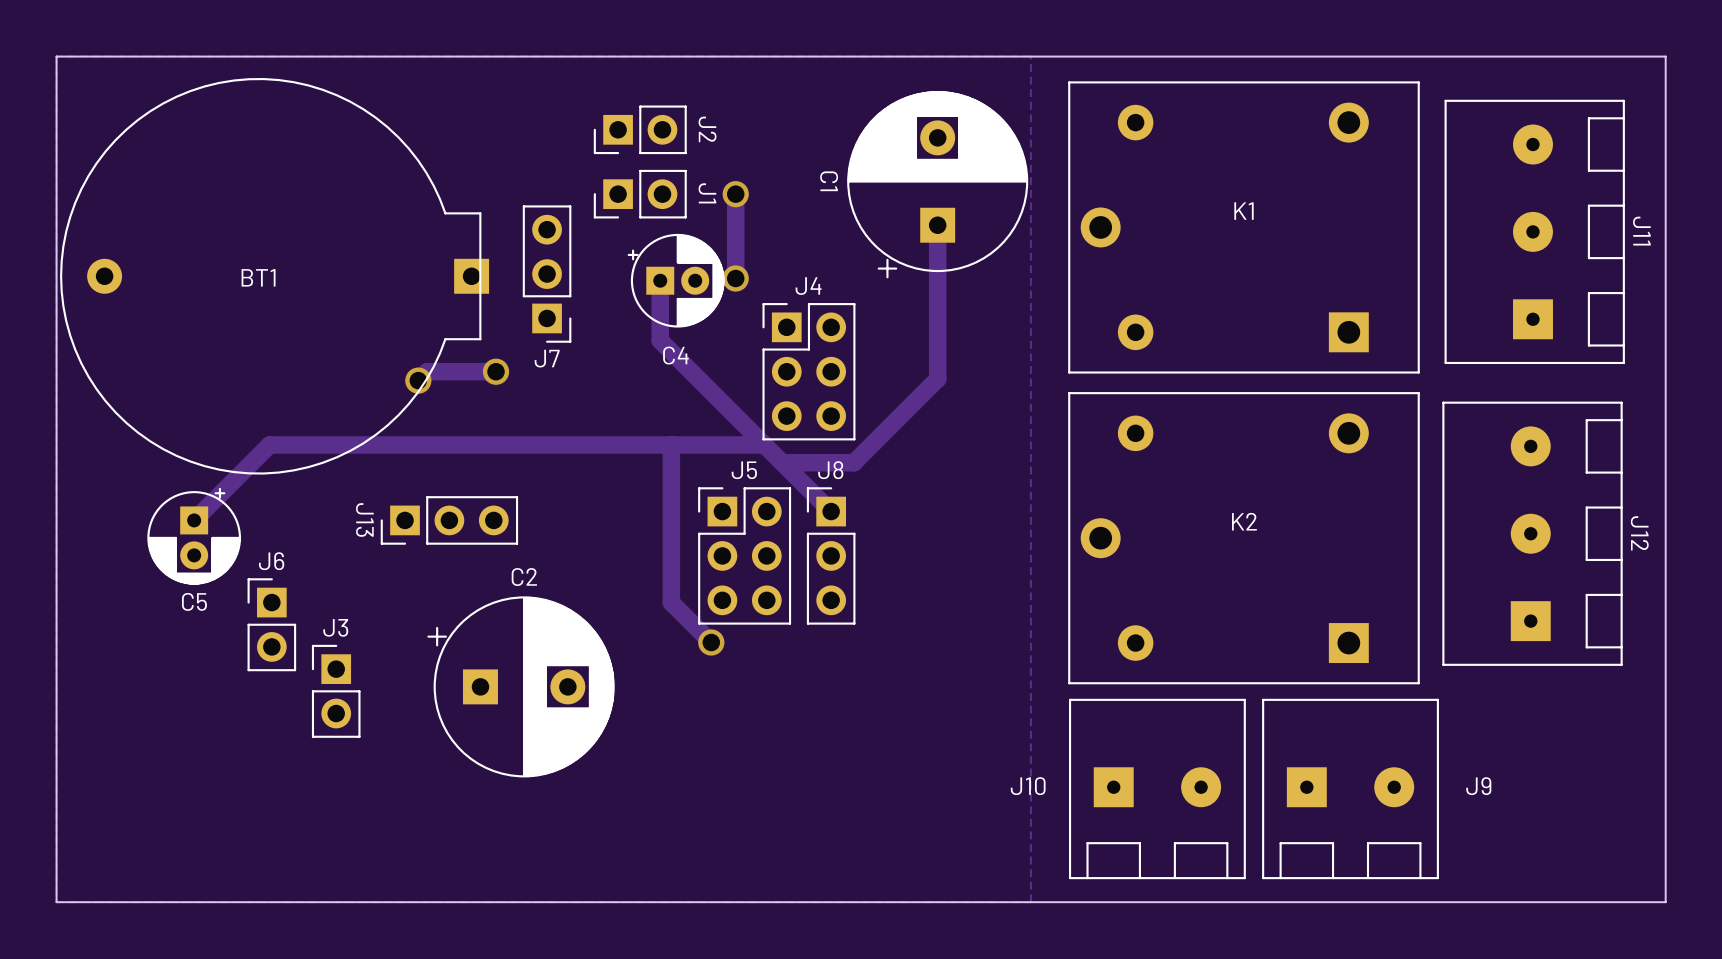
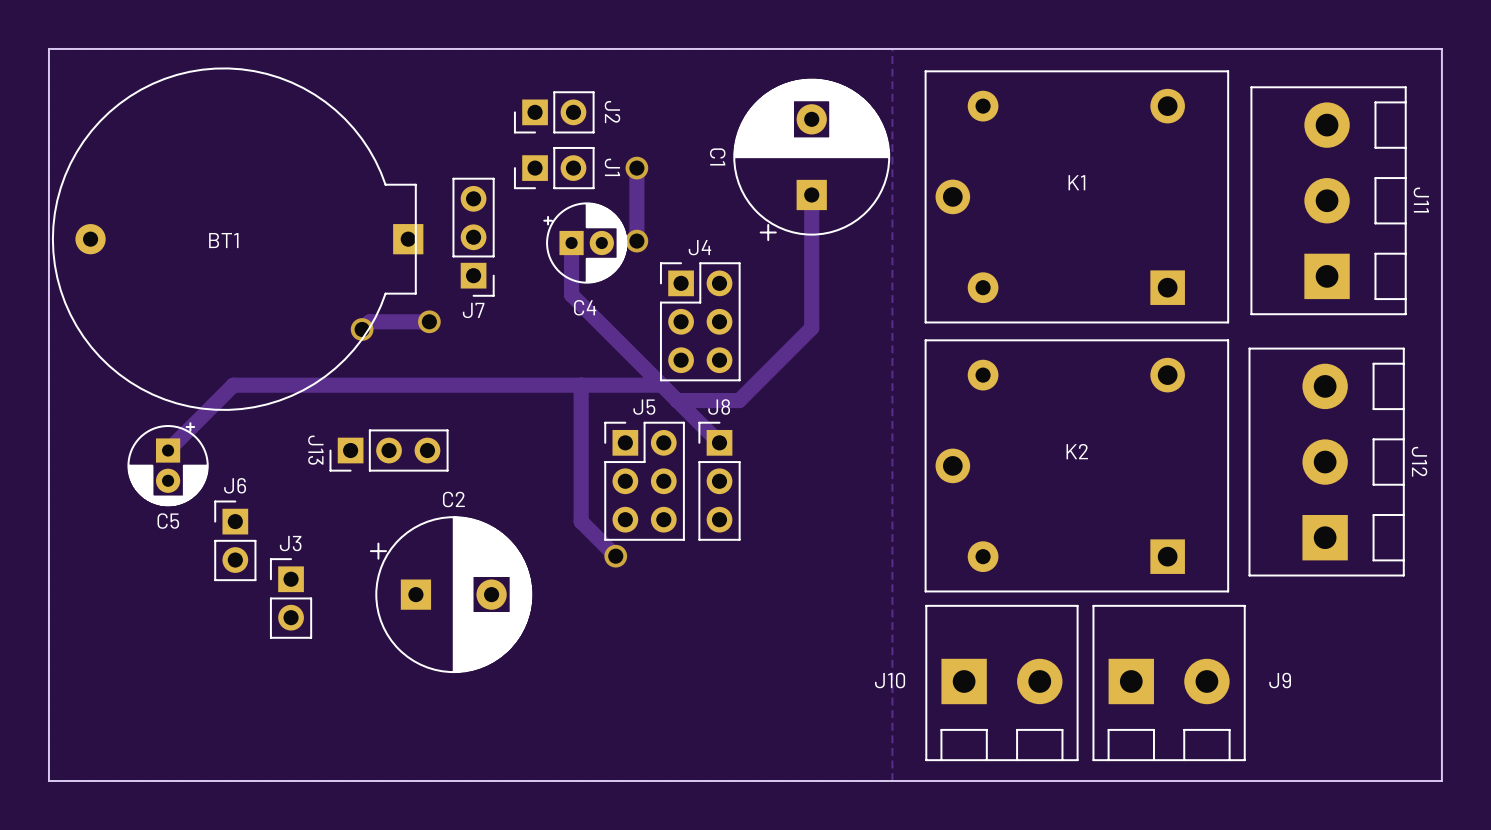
J11 footprint: [1444, 99, 1625, 365] -> [1250, 86, 1407, 316]
J12 footprint: [1442, 401, 1623, 666] -> [1248, 347, 1405, 577]
J10 footprint: [1068, 698, 1246, 880] -> [925, 604, 1079, 762]
J9 footprint: [1262, 698, 1439, 880] -> [1092, 604, 1246, 762]

